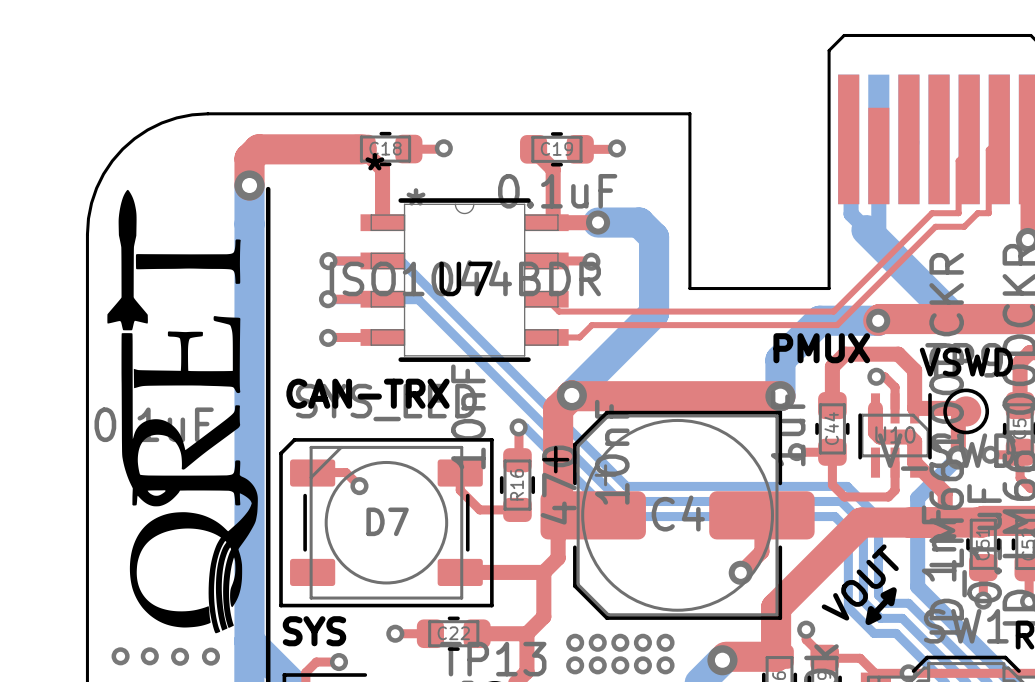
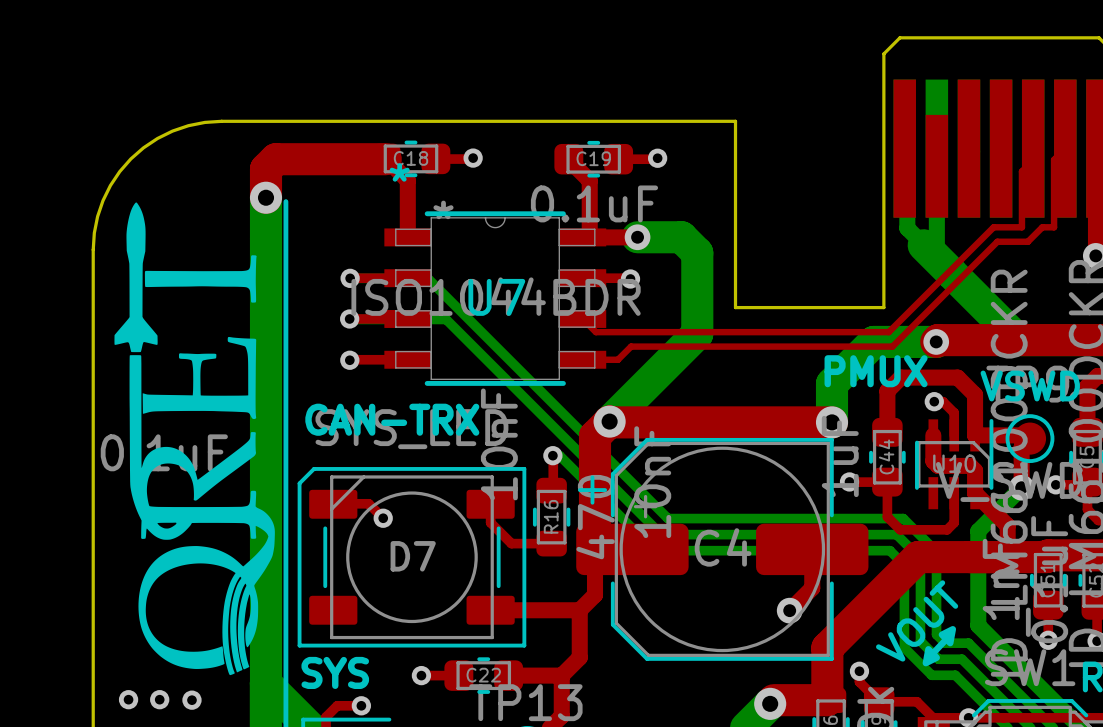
via: (575, 642) -> none
via: (597, 642) -> none
via: (620, 642) -> none
via: (642, 642) -> none
via: (665, 642) -> none
via: (210, 656) -> none
via: (575, 665) -> none
via: (597, 665) -> none
via: (620, 665) -> none
via: (642, 665) -> none
via: (665, 665) -> none

